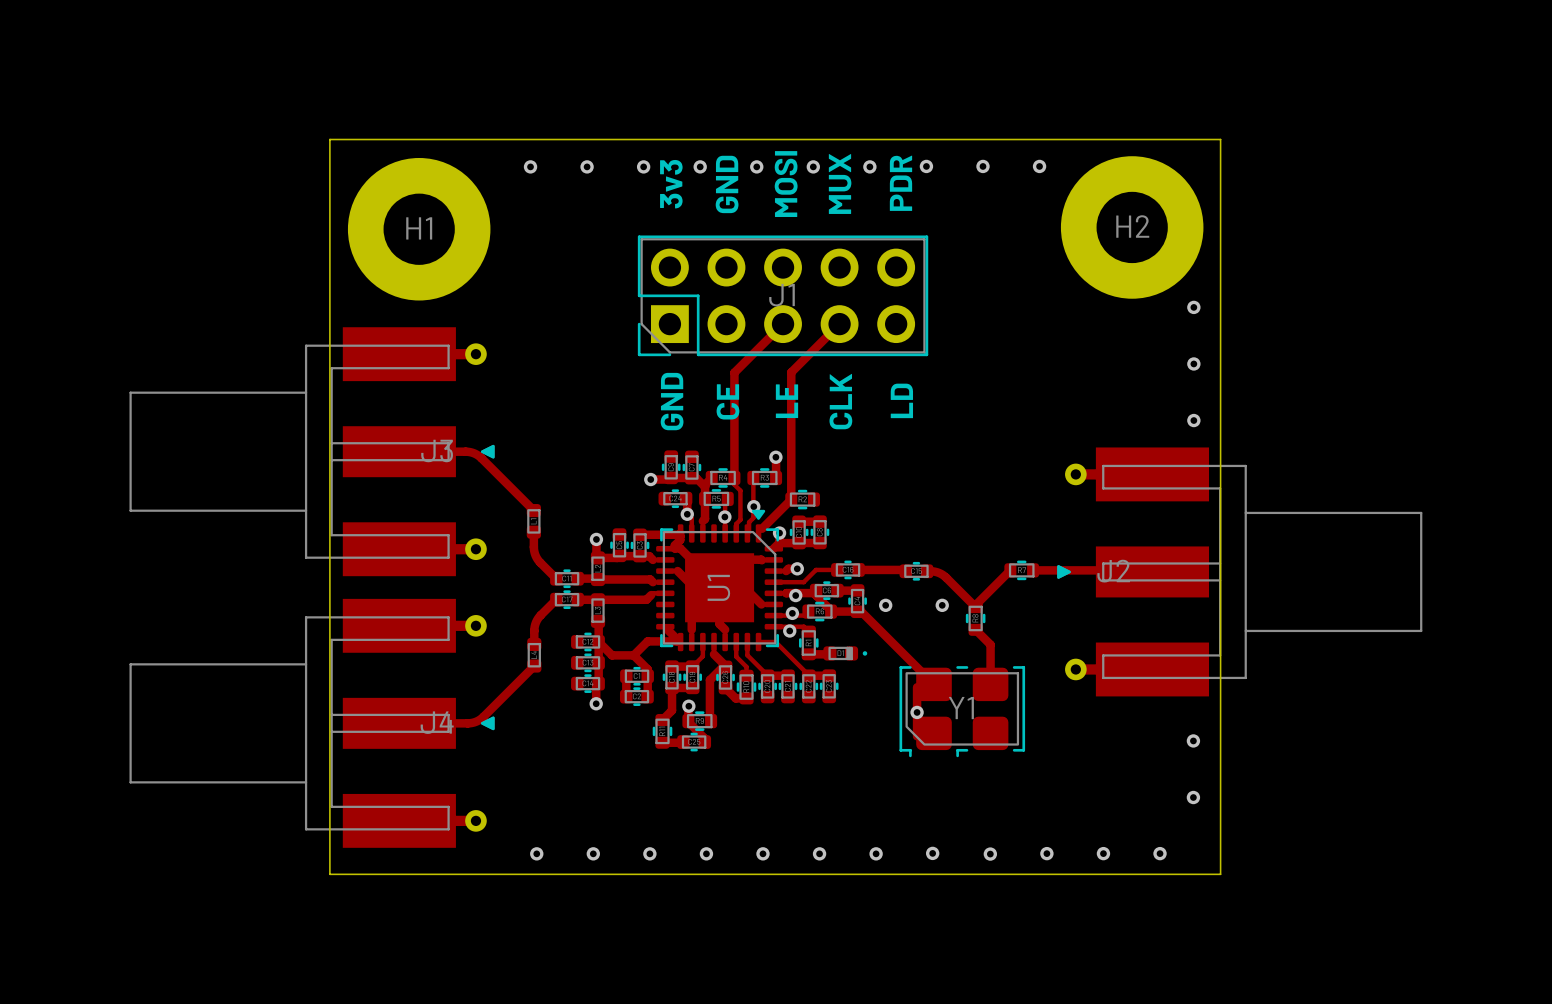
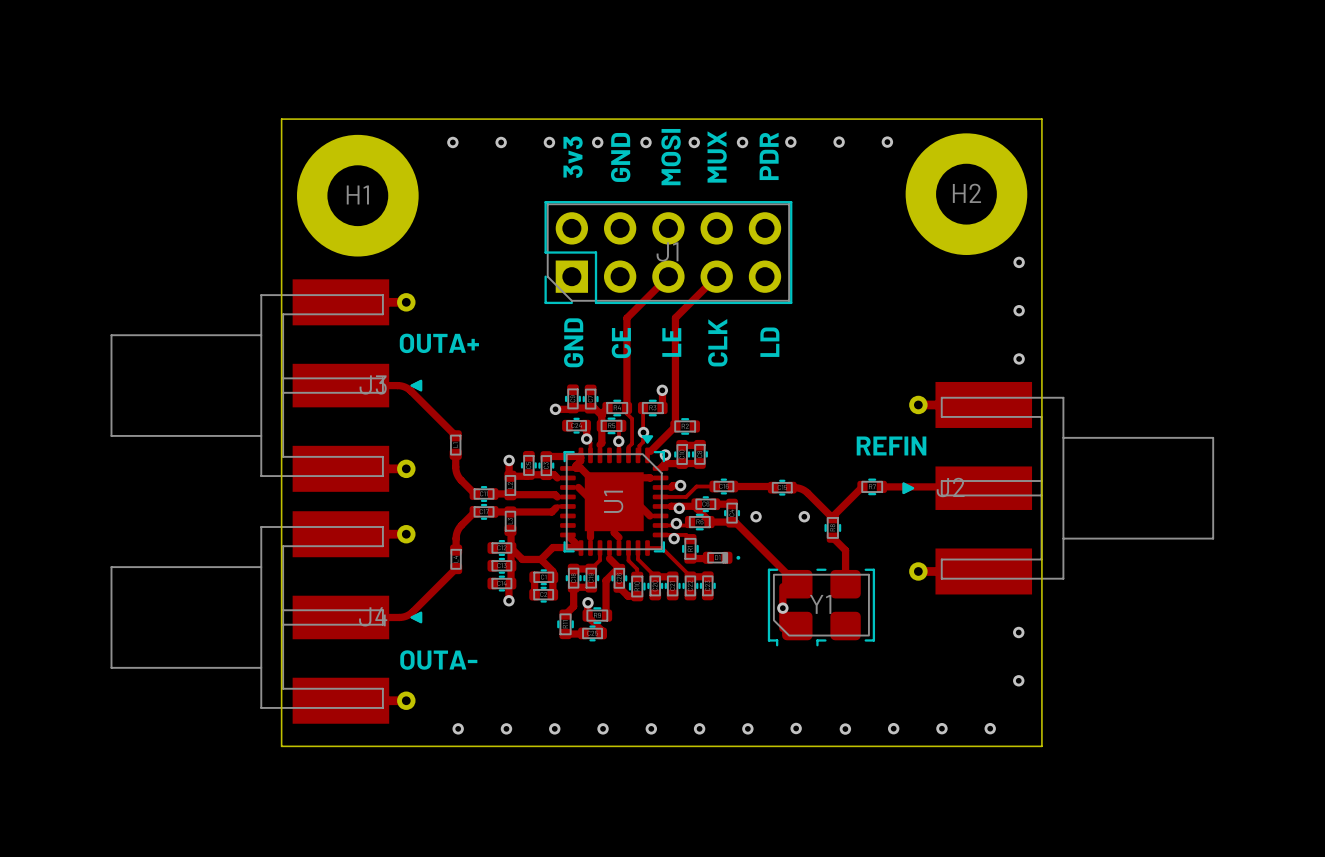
text: none -> OUTA+ (439, 343)
text: none -> REFIN (891, 445)
text: none -> OUTA- (438, 660)

